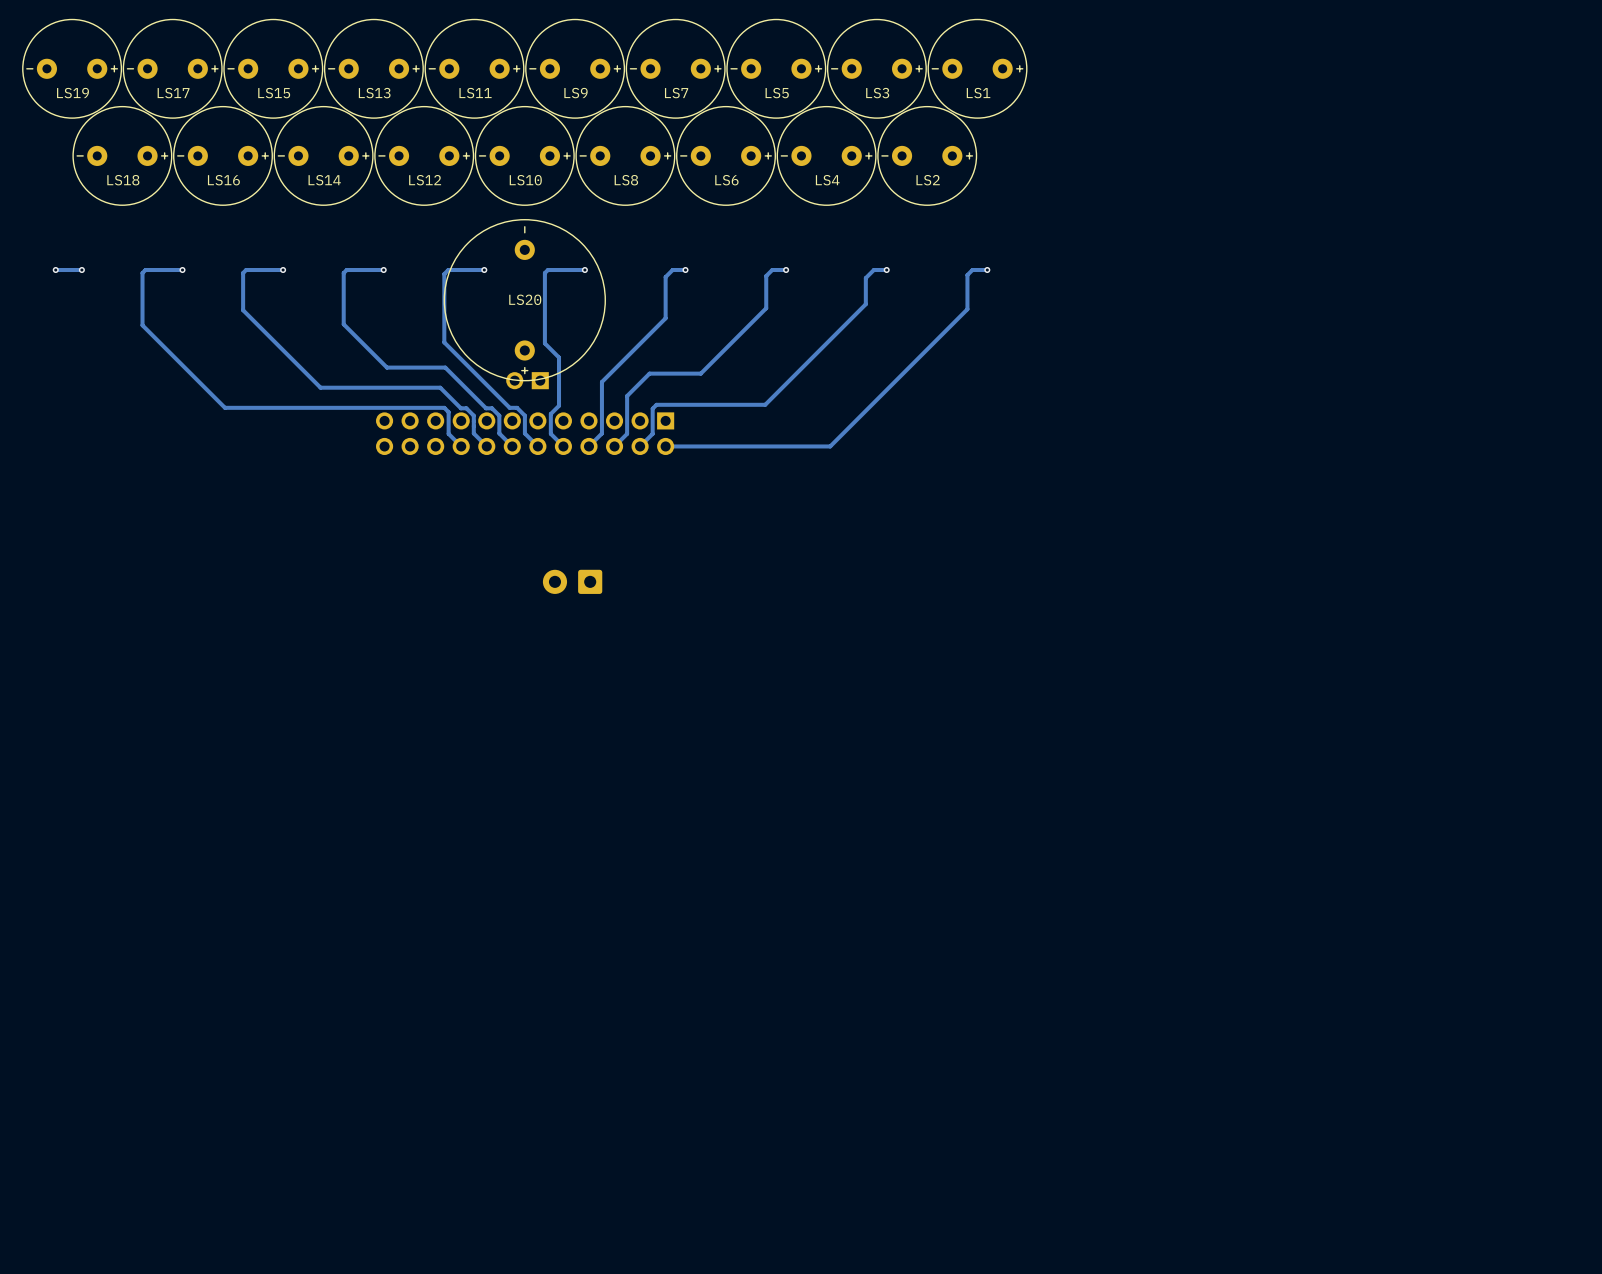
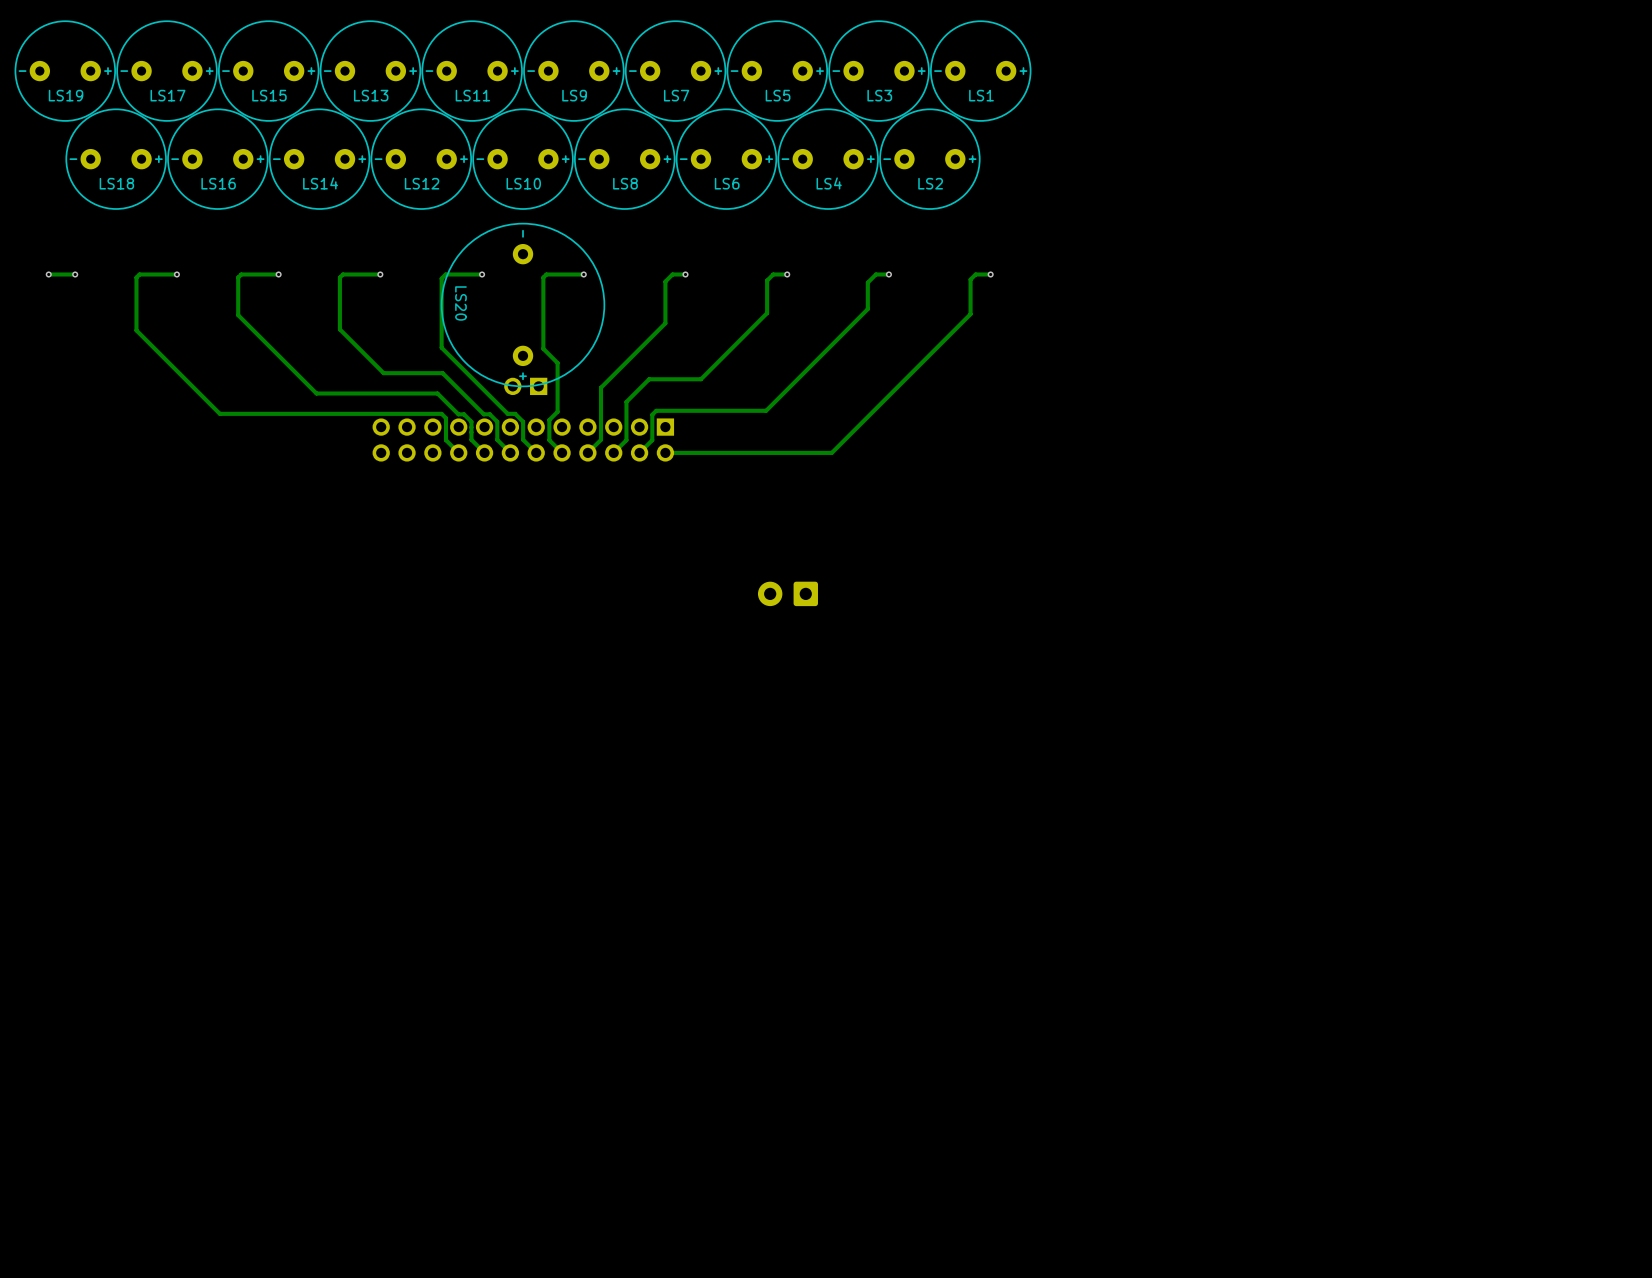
LS20 name rotation: 0° (525, 299) -> 90° clockwise (460, 303)
LS20 name position: LS20 (525, 299) -> LS20 (460, 303)
part position: (572, 581) -> (787, 593)

